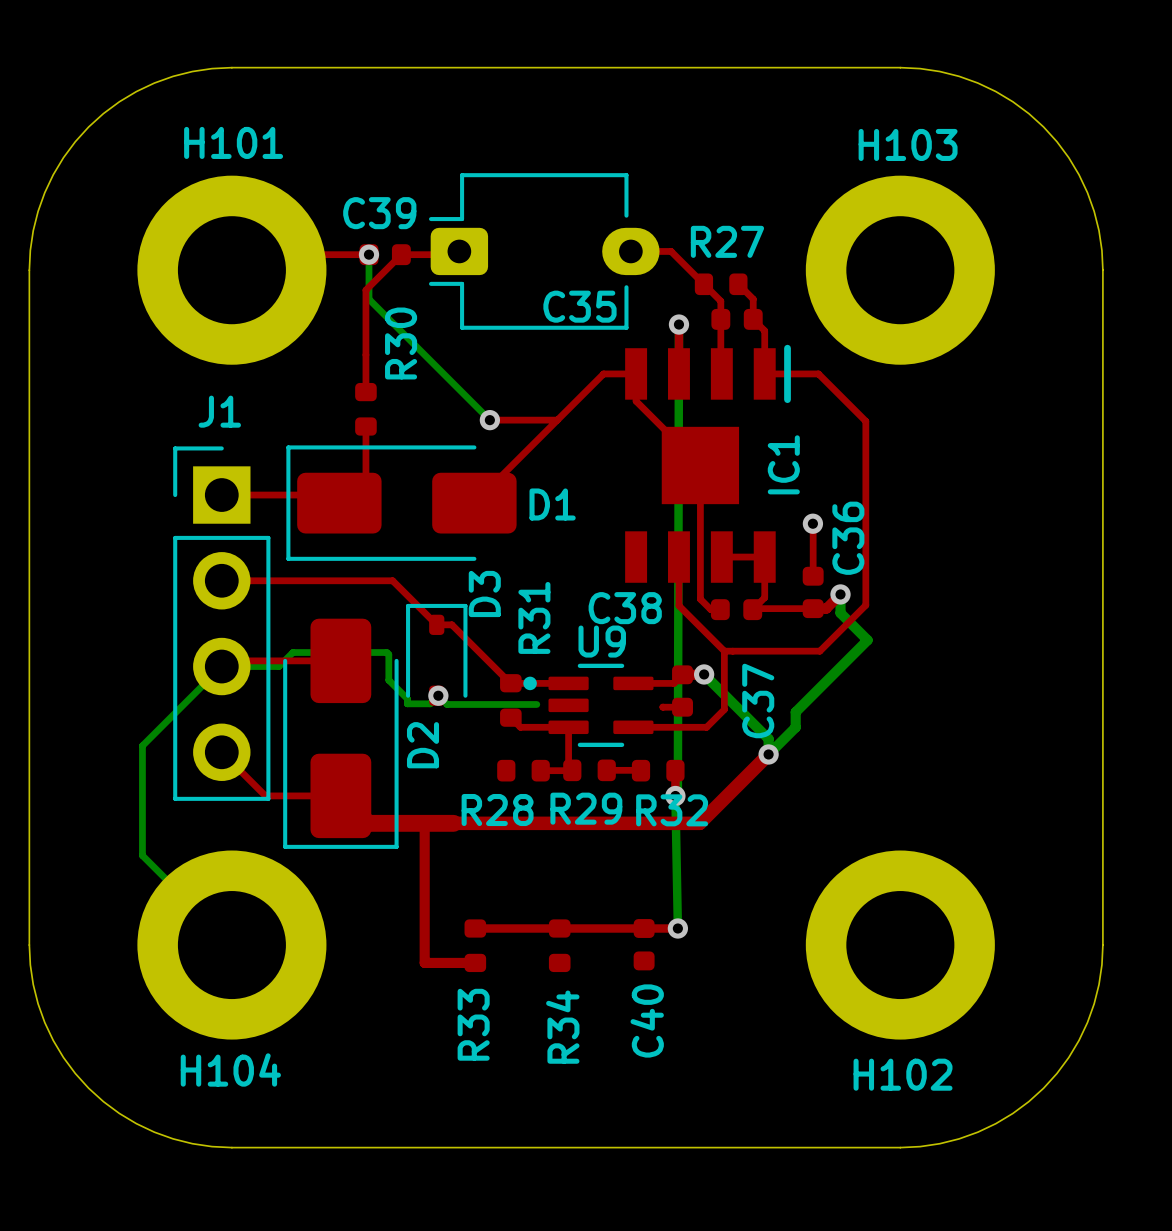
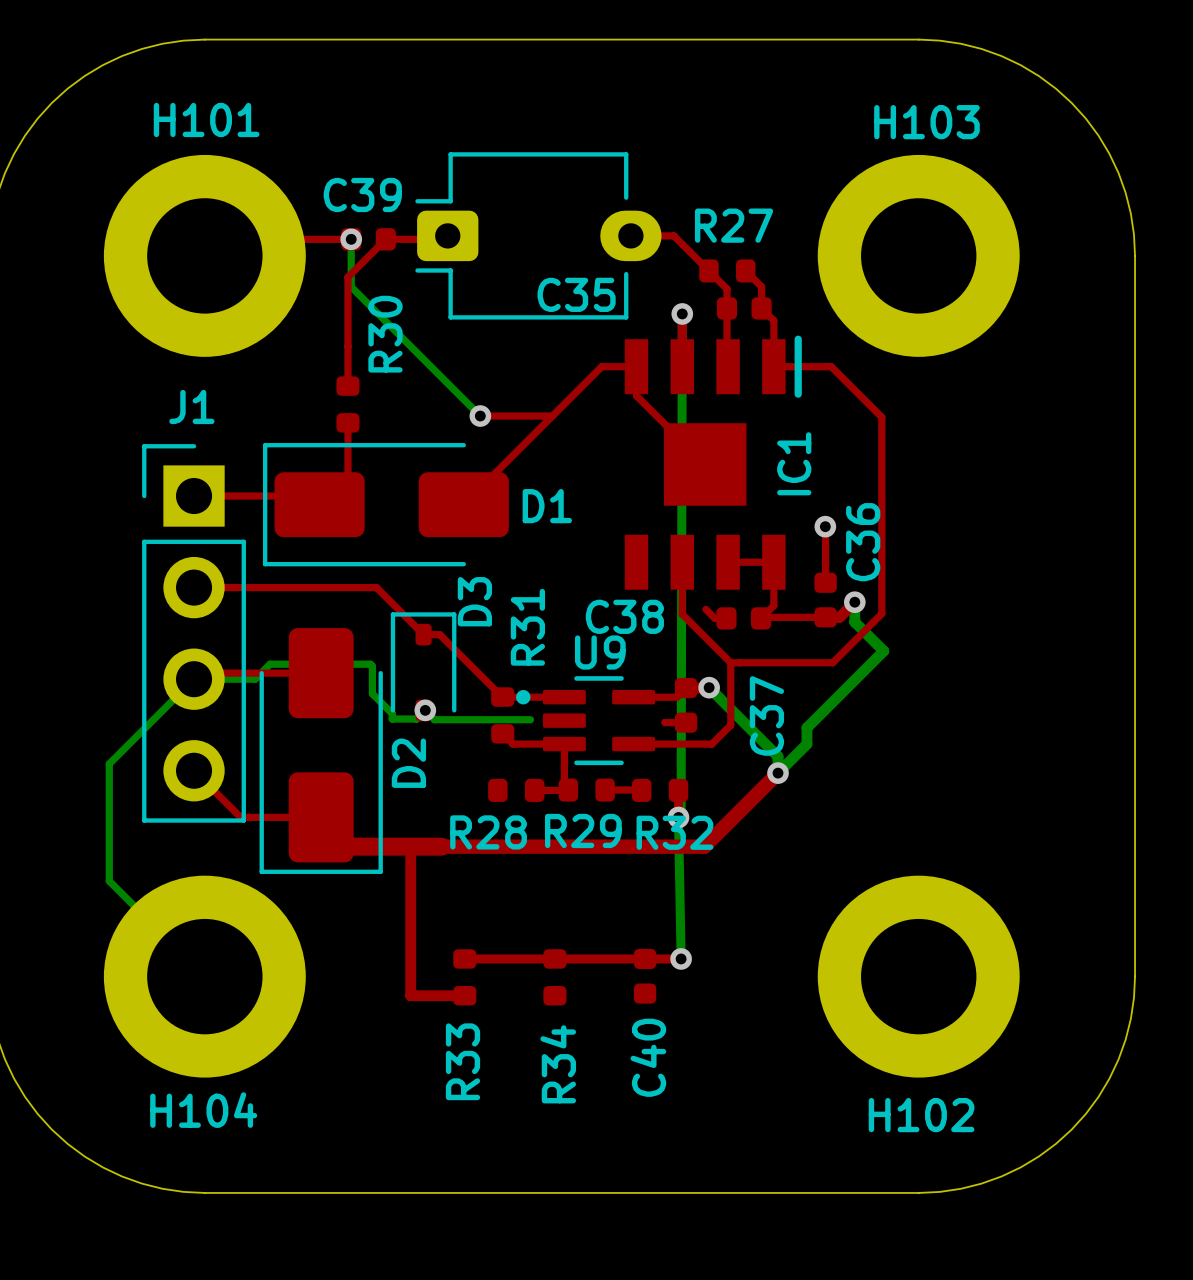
top track: (700, 467) (700, 599) (710, 609) -> (705, 609) (716, 618)

